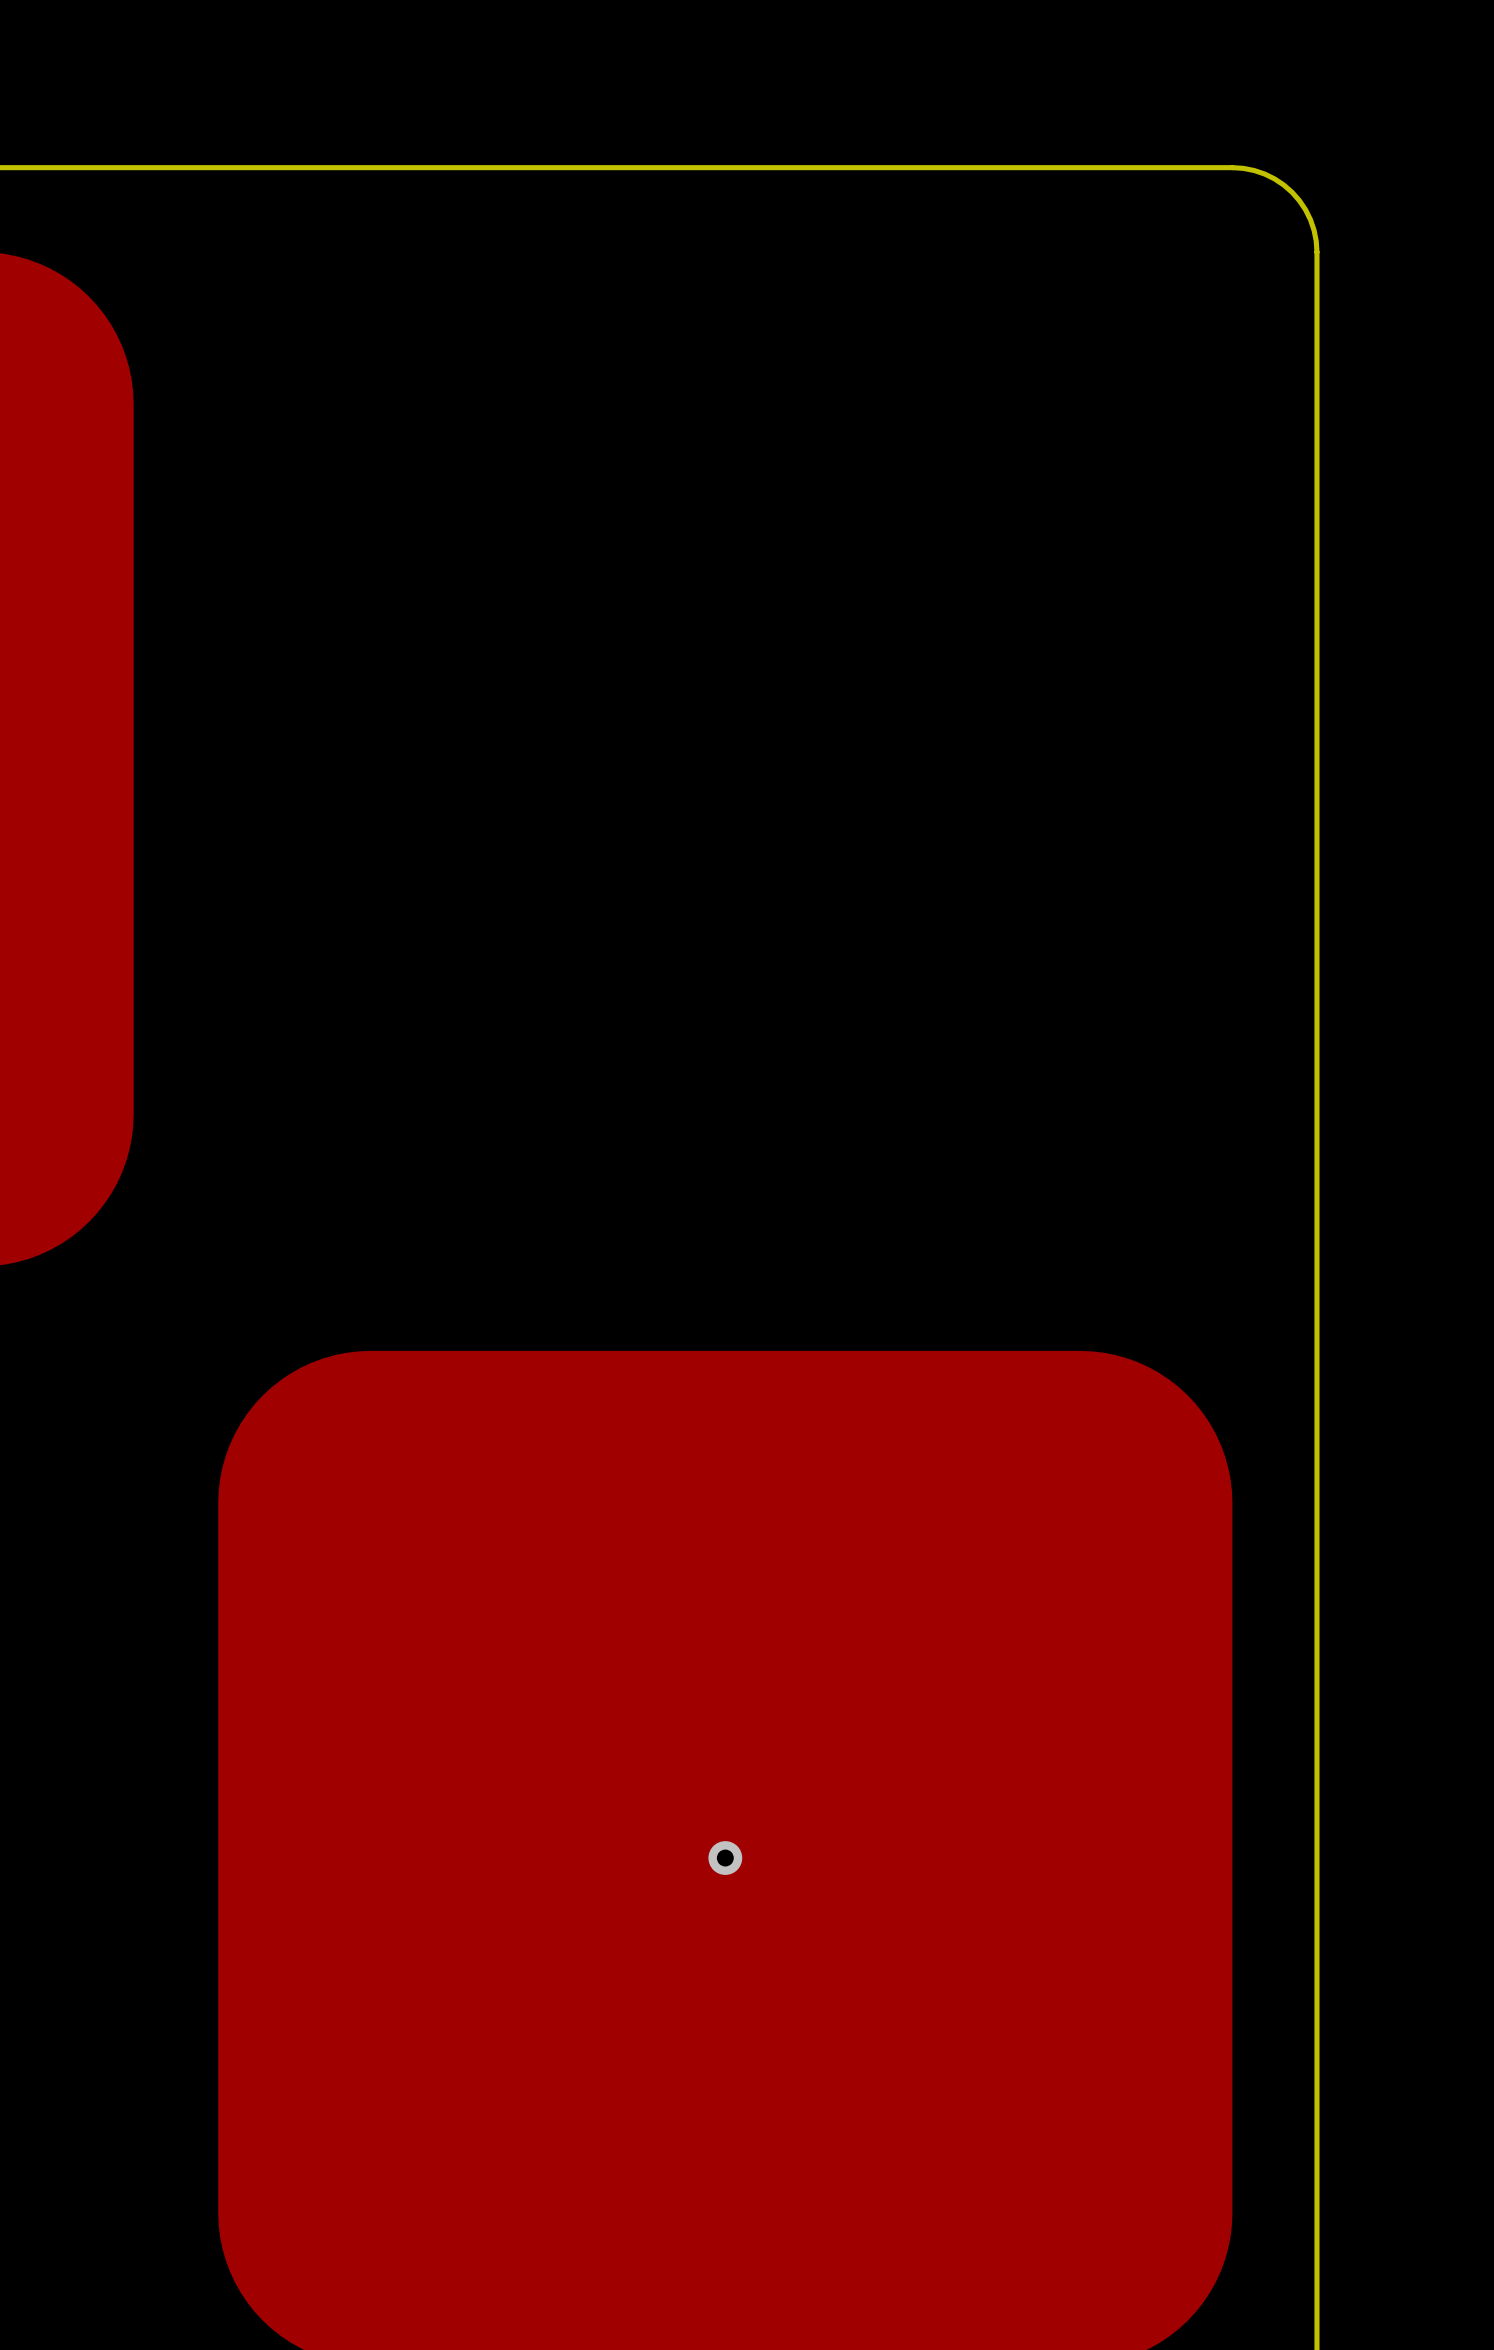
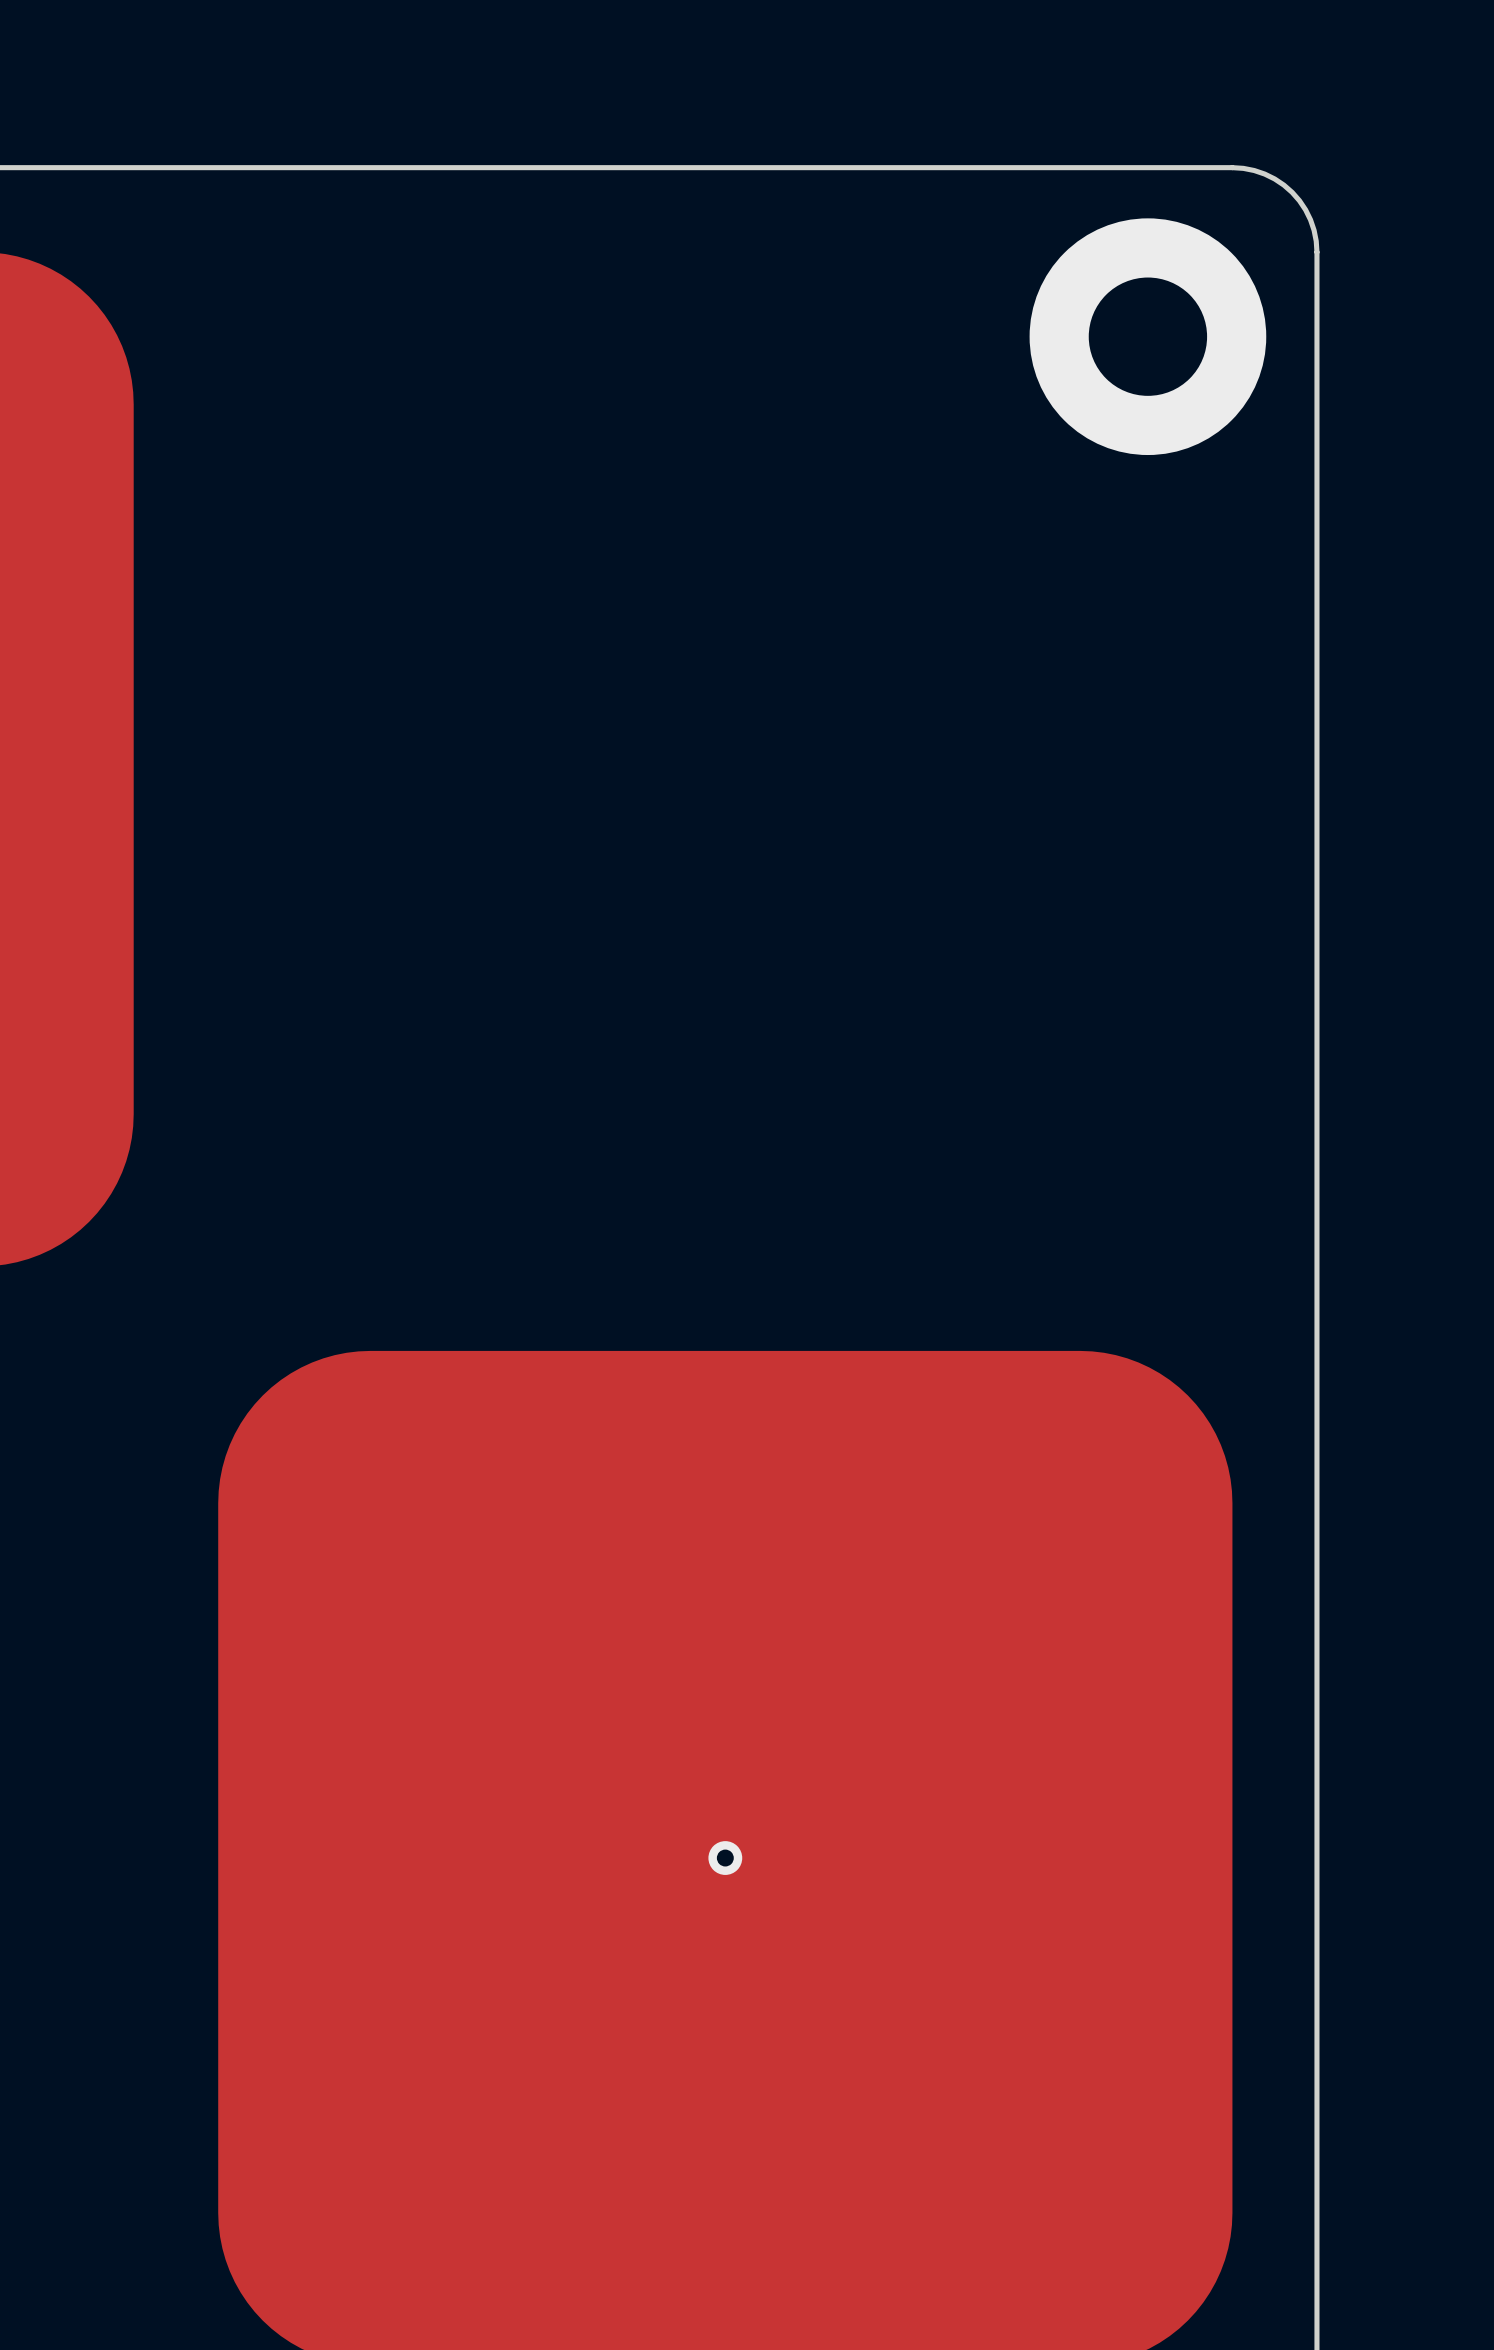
via: none -> (1147, 336)

